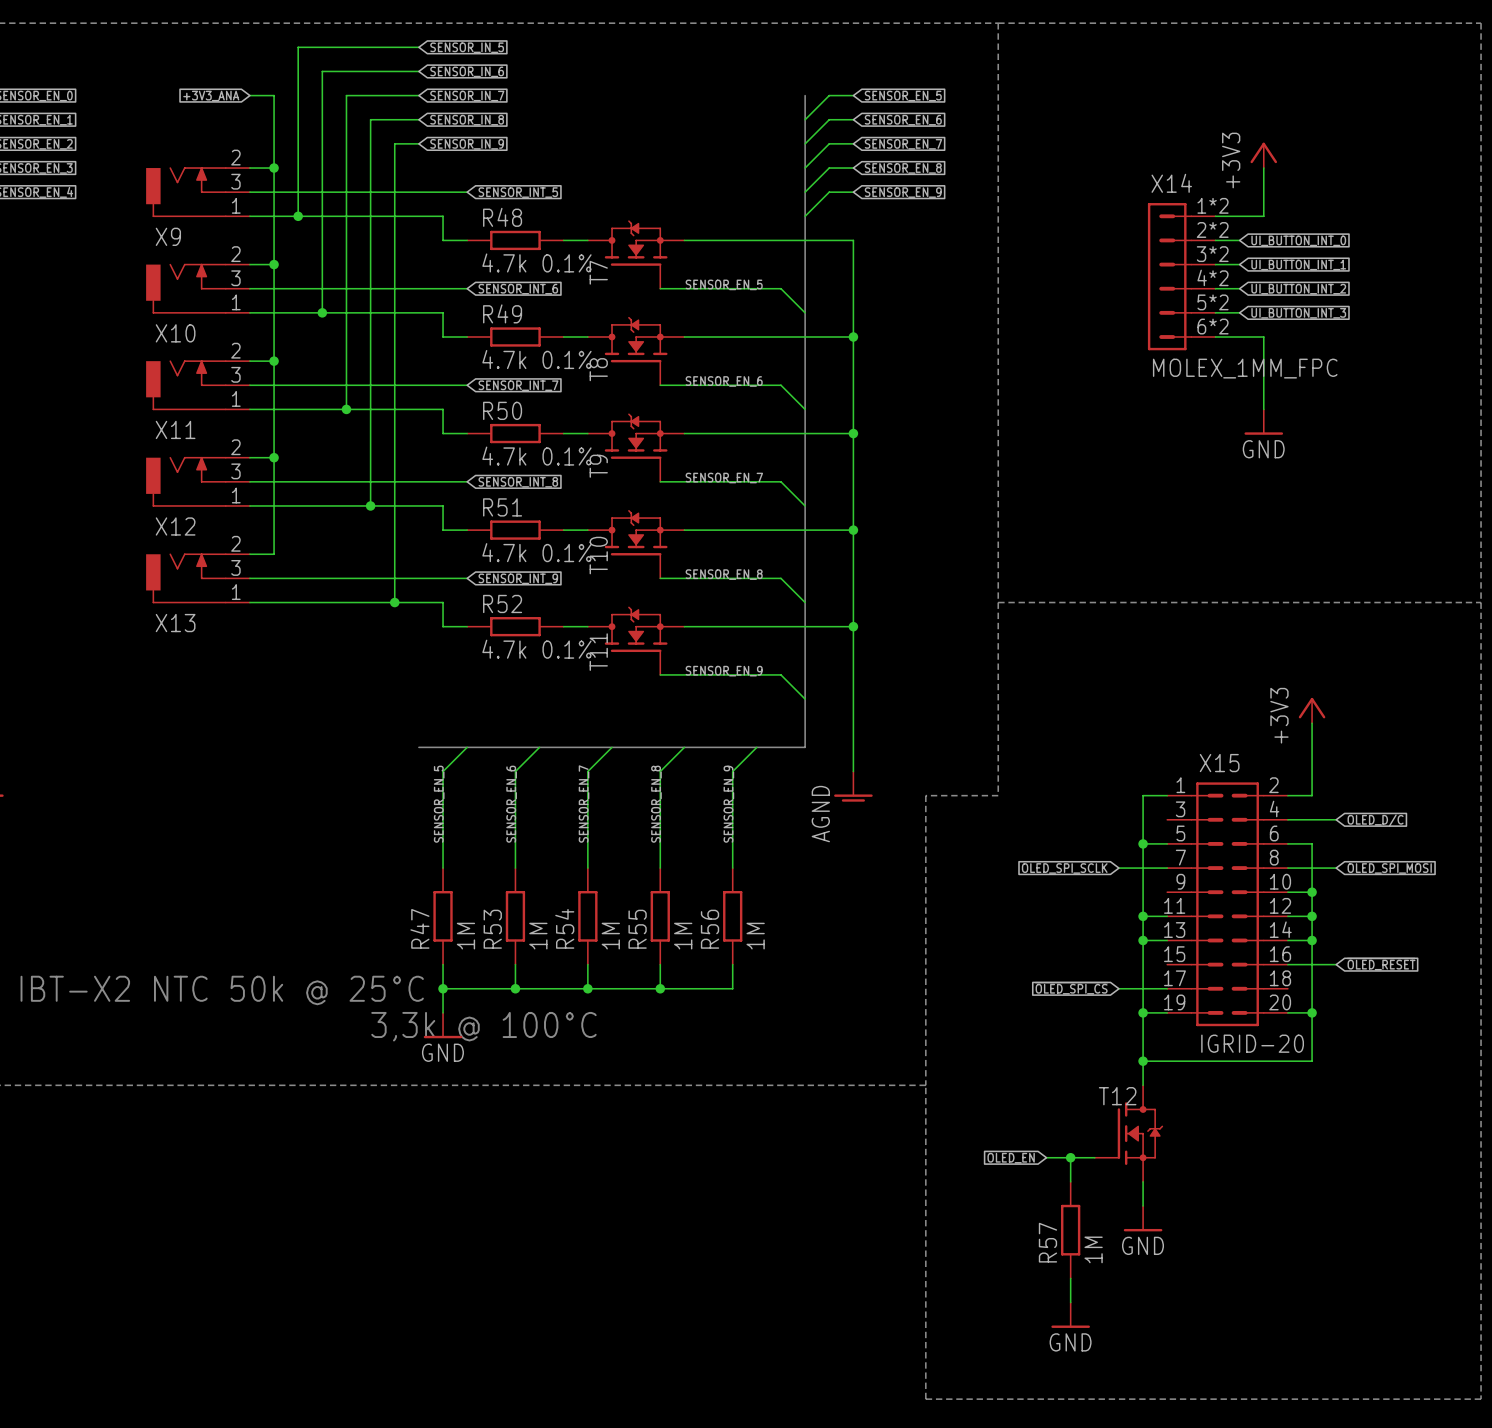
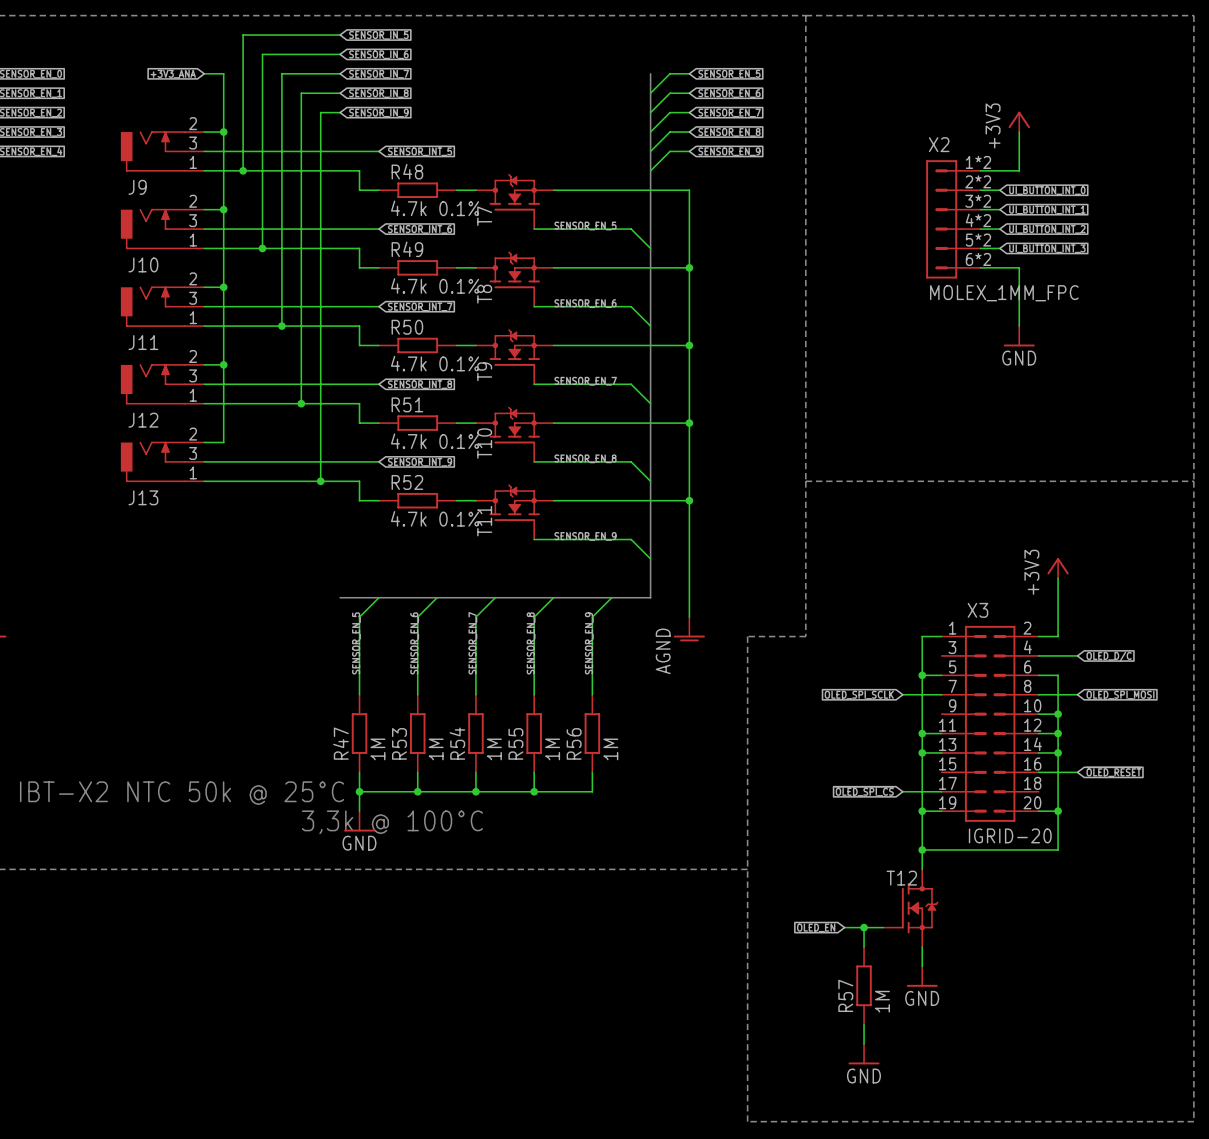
X14 name: X14 (1171, 183) -> X2 (939, 144)
X9 name: X9 (168, 236) -> J9 (137, 187)
X10 name: X10 (175, 333) -> J10 (143, 264)
X11 name: X11 (175, 429) -> J11 (143, 342)
X12 name: X12 (175, 526) -> J12 (143, 420)
X13 name: X13 (175, 623) -> J13 (143, 497)
X15 name: X15 (1219, 763) -> X3 (977, 610)

